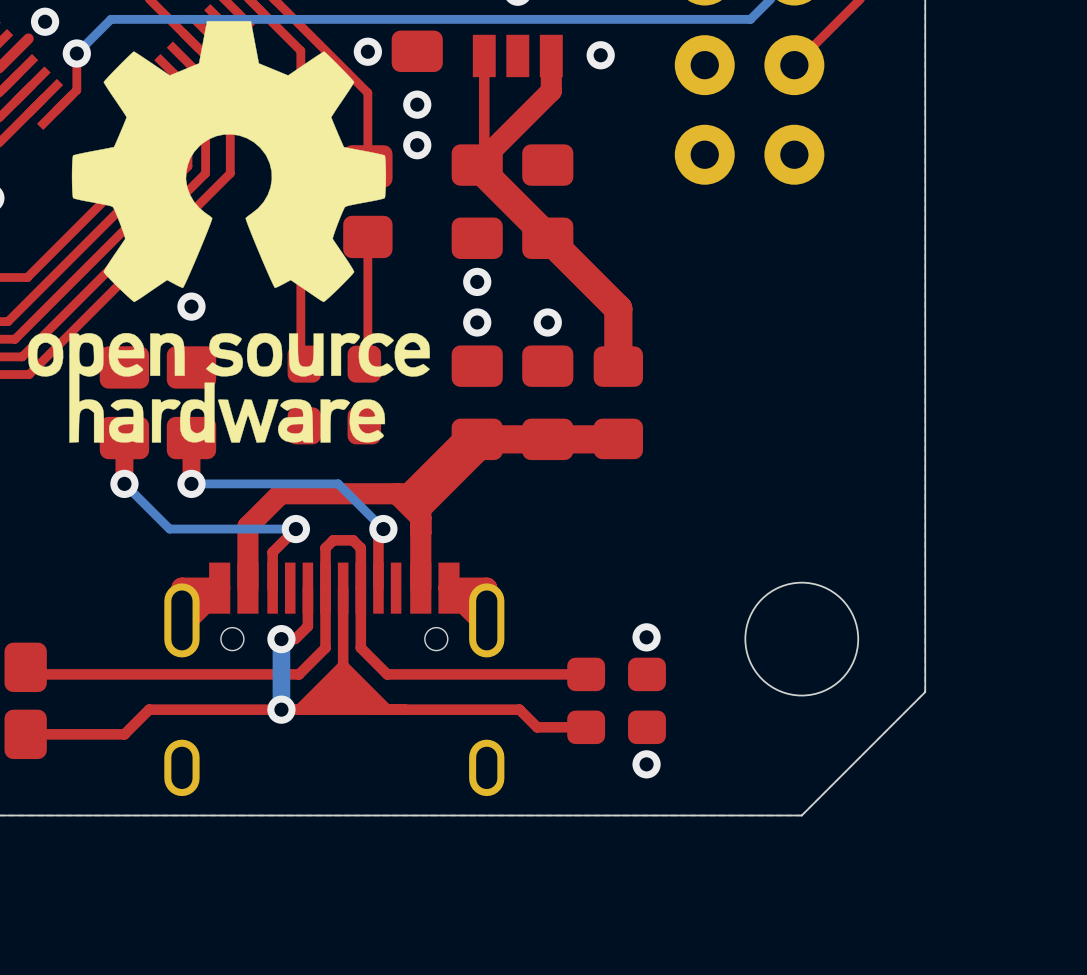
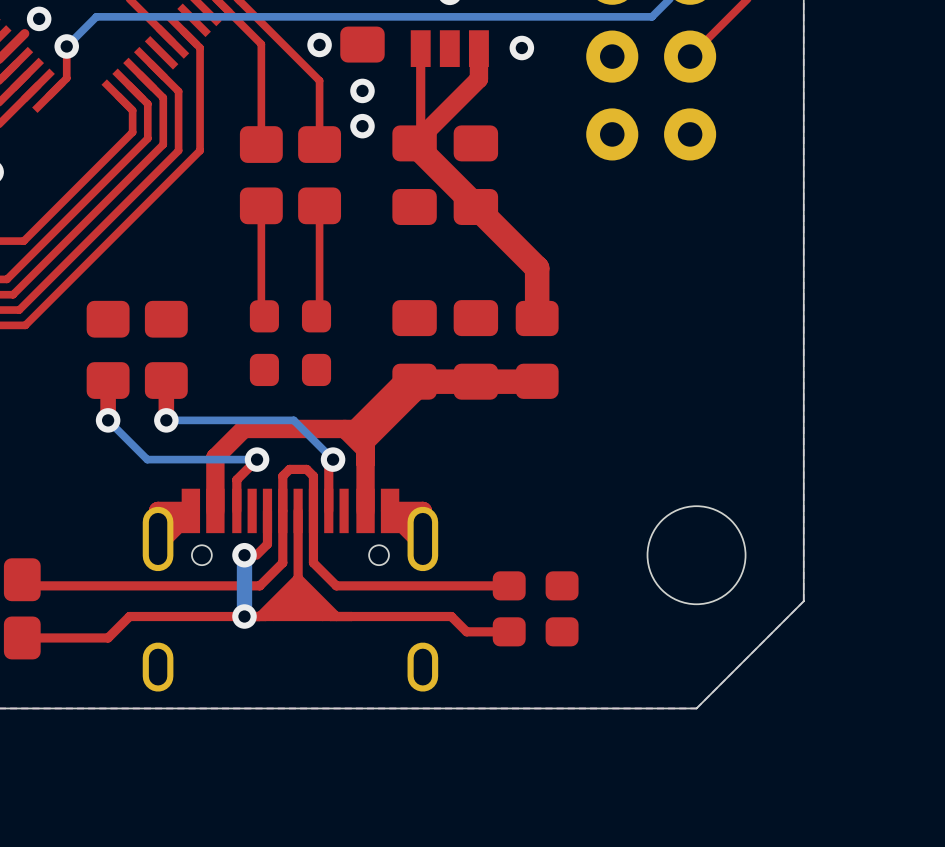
drawing: [28, 21, 430, 443] -> none
via: (477, 281) -> none
via: (191, 306) -> none
via: (477, 322) -> none
via: (547, 322) -> none
via: (646, 637) -> none
via: (646, 764) -> none

